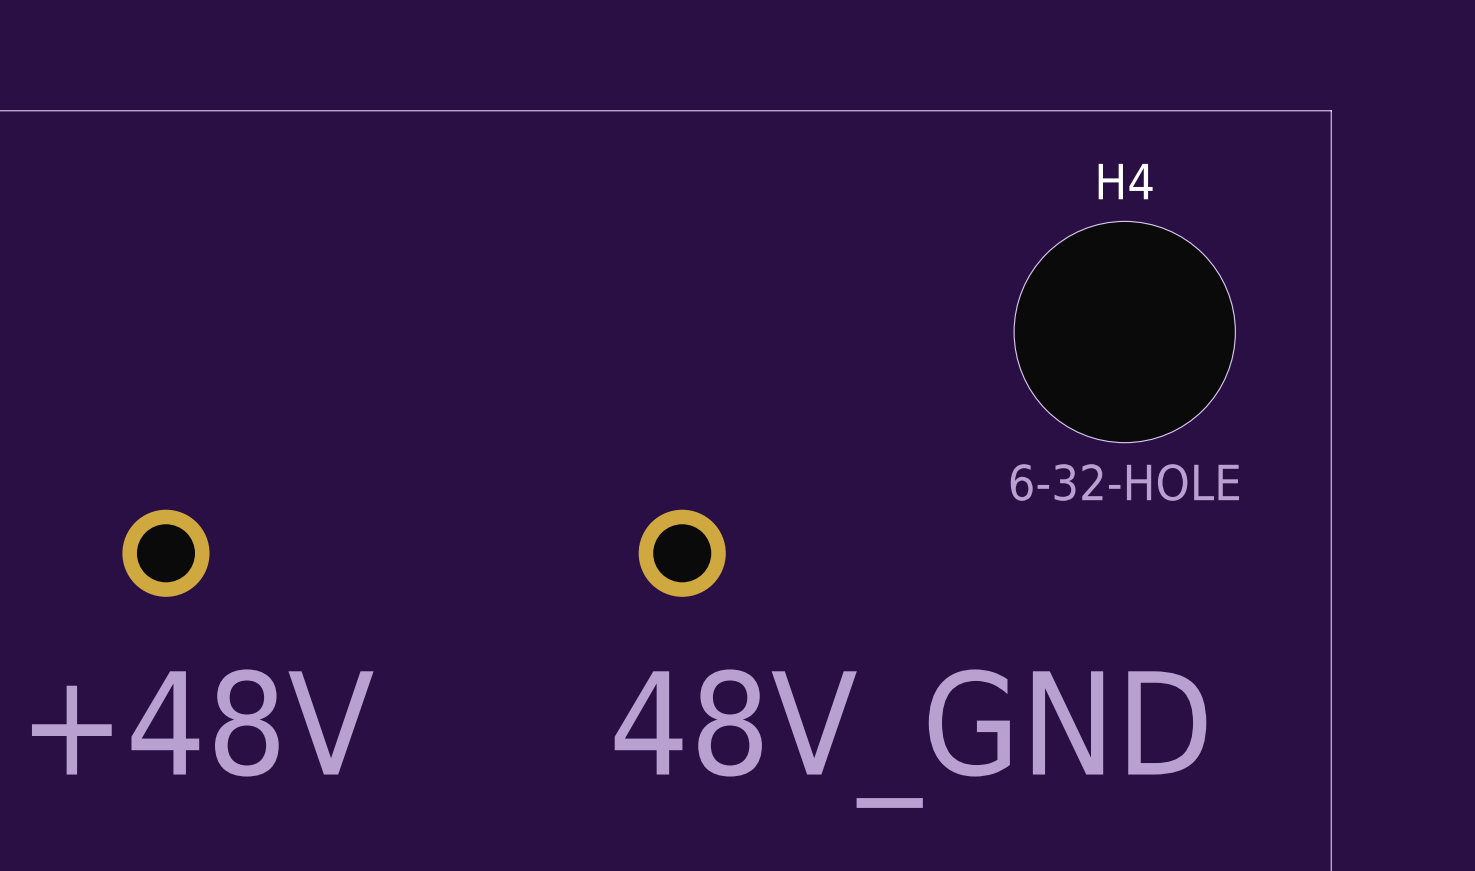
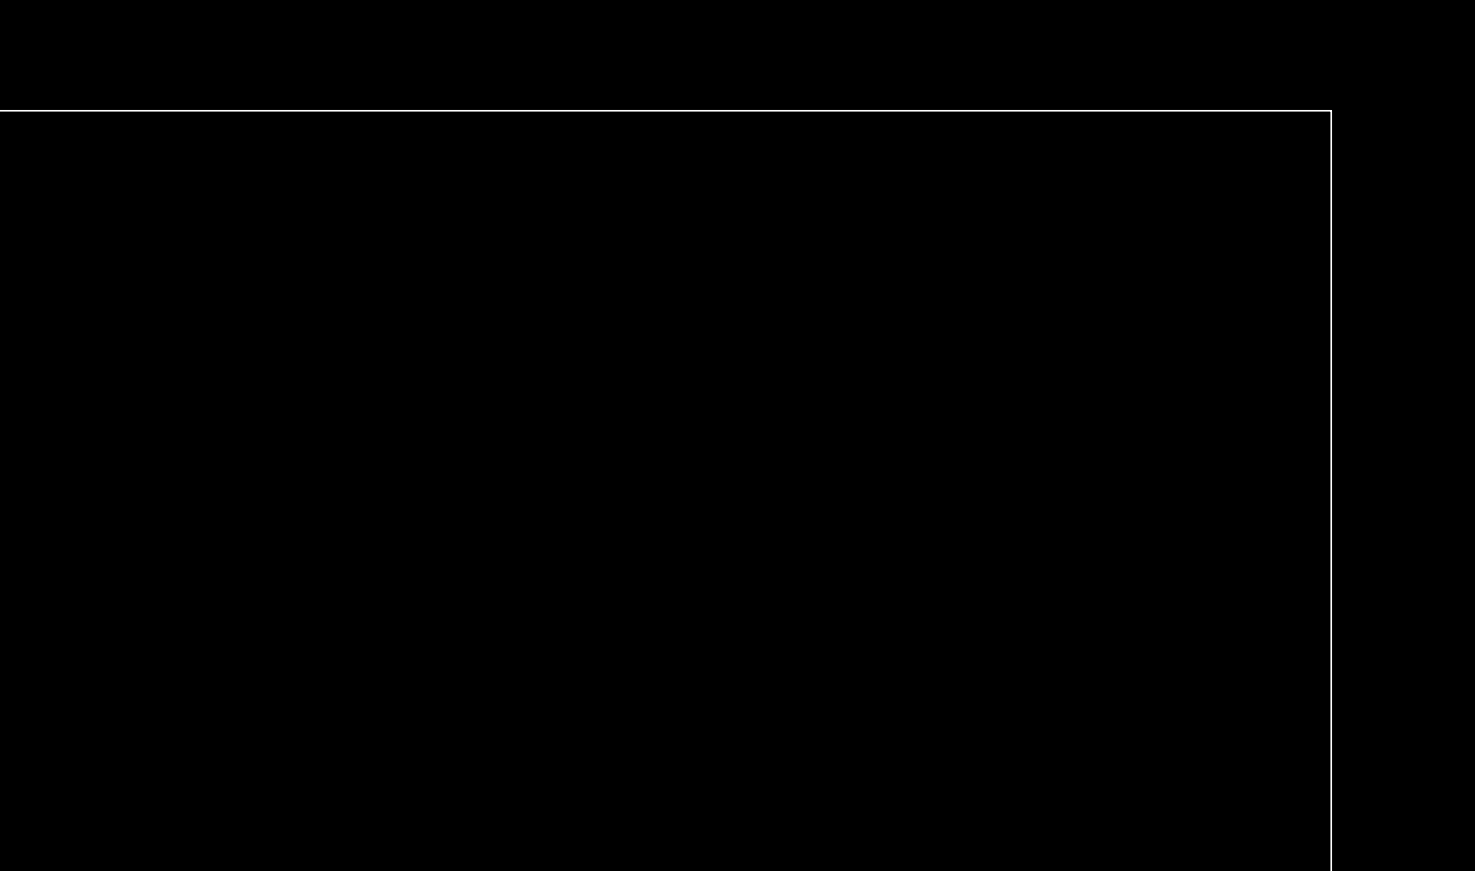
H4: 6-32-HOLE (1124, 332) -> none
via: (165, 553) -> none
via: (682, 553) -> none
text: +48V (202, 722) -> none
text: 48V_GND (910, 738) -> none

